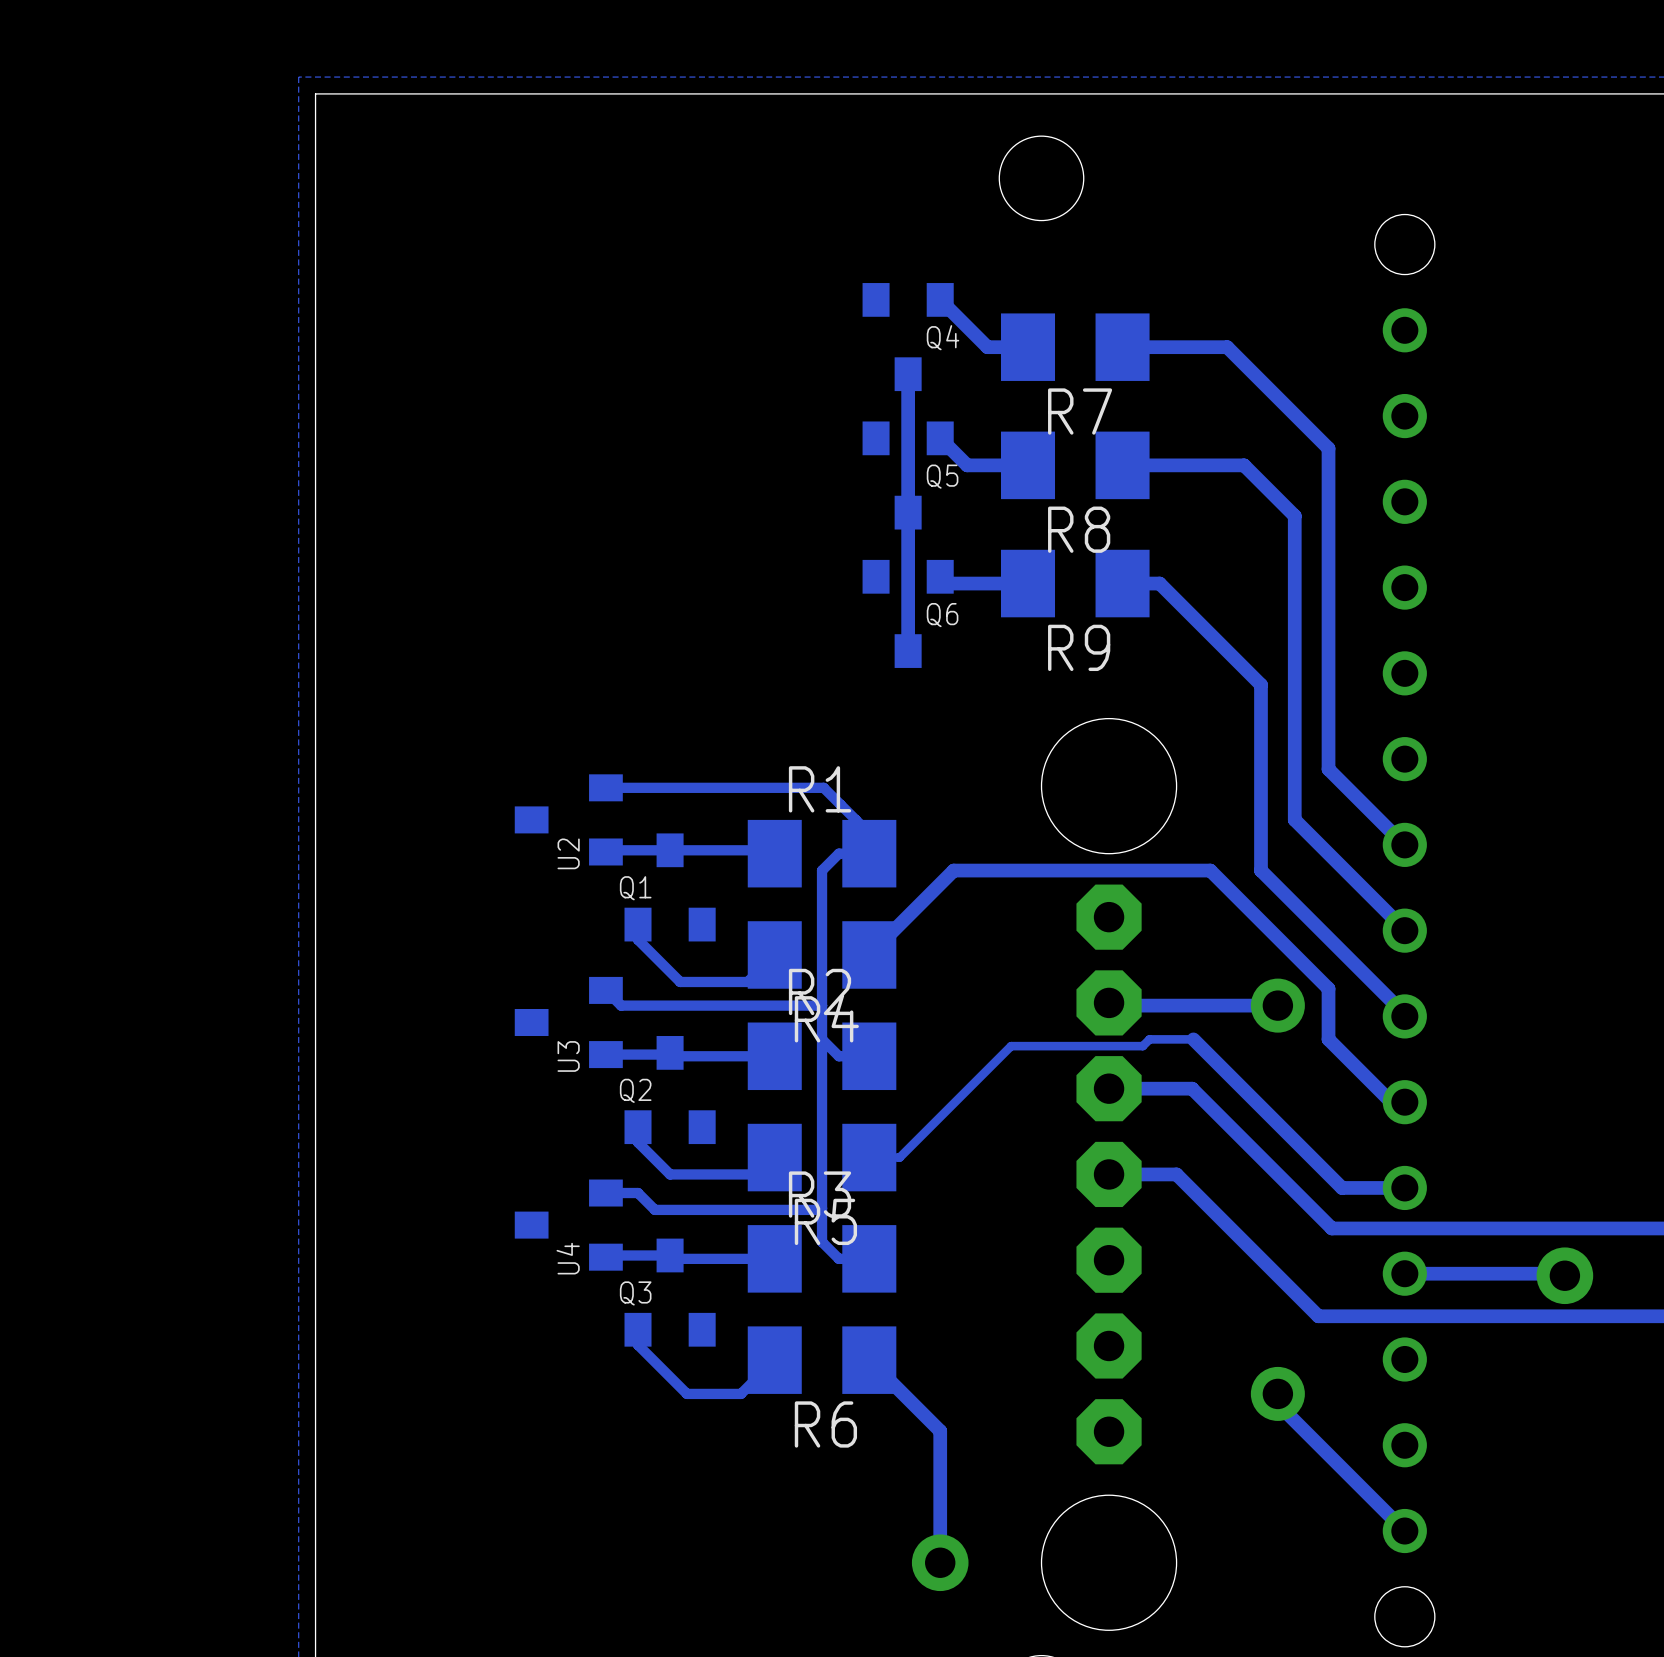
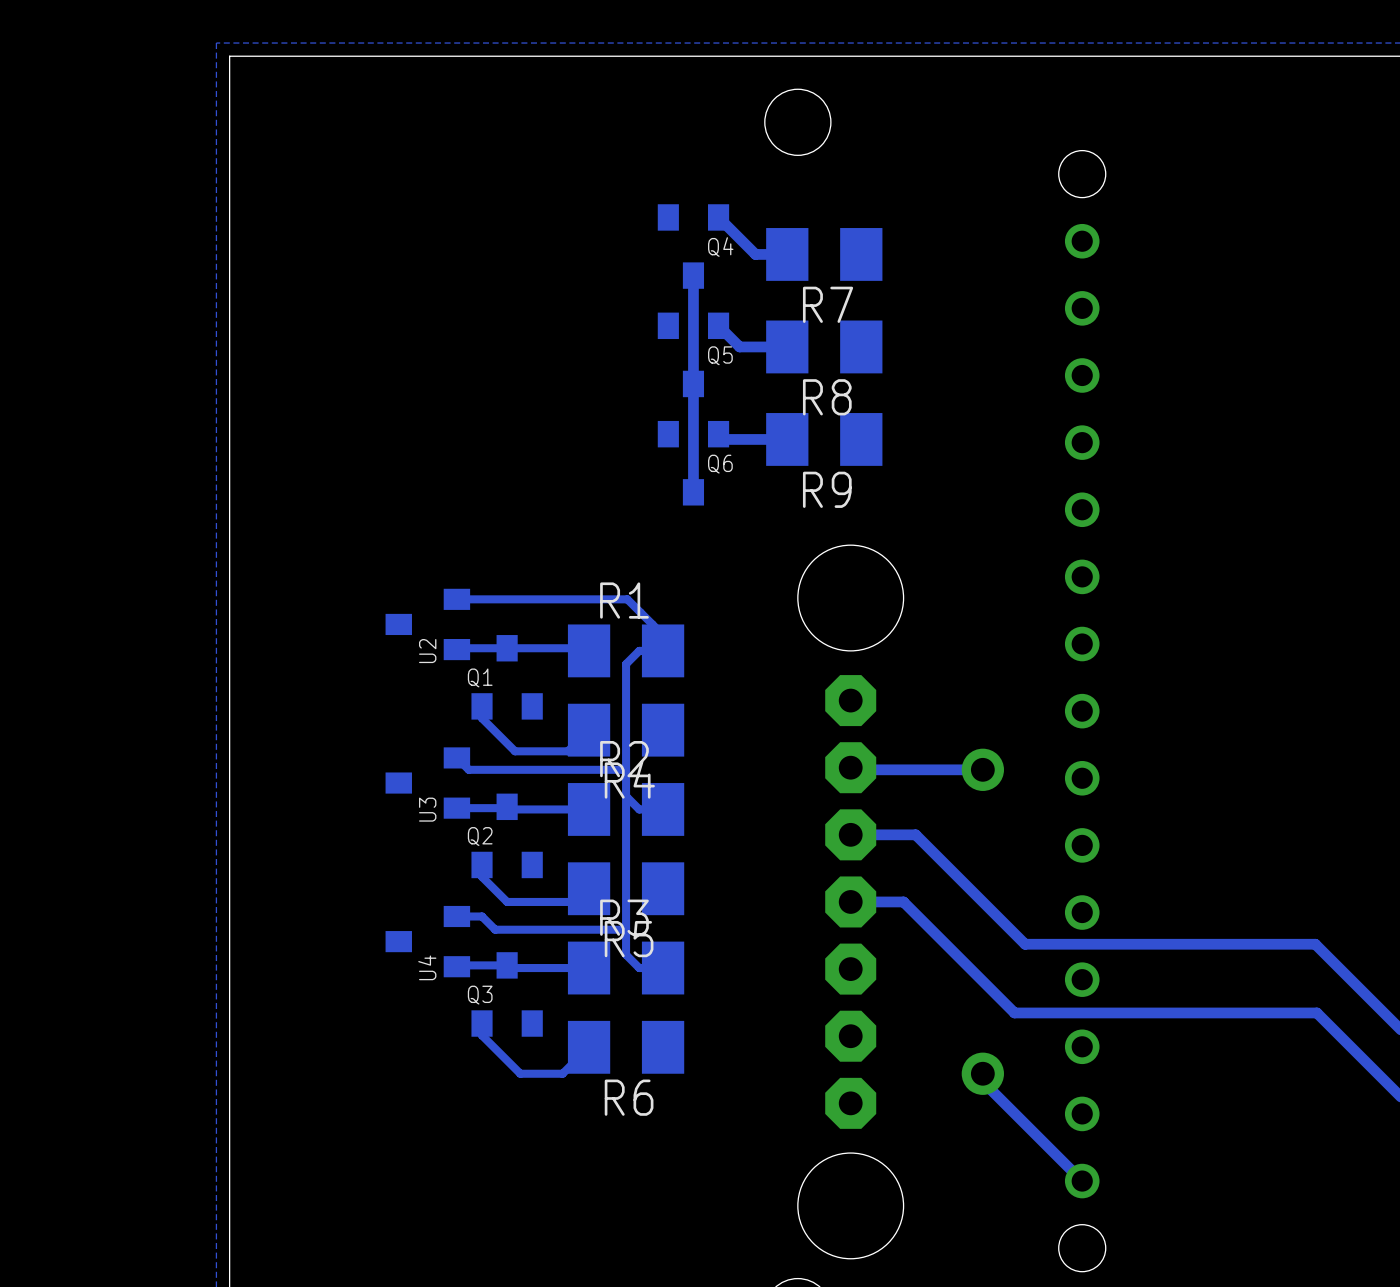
track: (1122, 347) (1227, 347) (1328, 448) (1328, 769) (1404, 844) -> none
track: (1122, 465) (1244, 465) (1294, 516) (1294, 819) (1404, 929) -> none
track: (1122, 583) (1159, 583) (1260, 684) (1260, 870) (1404, 1016) -> none
track: (869, 954) (953, 870) (1210, 870) (1328, 988) (1328, 1039) (1391, 1102) (1404, 1102) -> none
track: (869, 1157) (899, 1157) (1011, 1046) (1142, 1046) (1149, 1039) (1193, 1039) (1342, 1187) (1404, 1187) -> none
track: (1404, 1273) (1562, 1273) (1564, 1275) -> none
via: (1564, 1275) -> none
track: (869, 1360) (940, 1431) (940, 1562) -> none
via: (940, 1562) -> none

